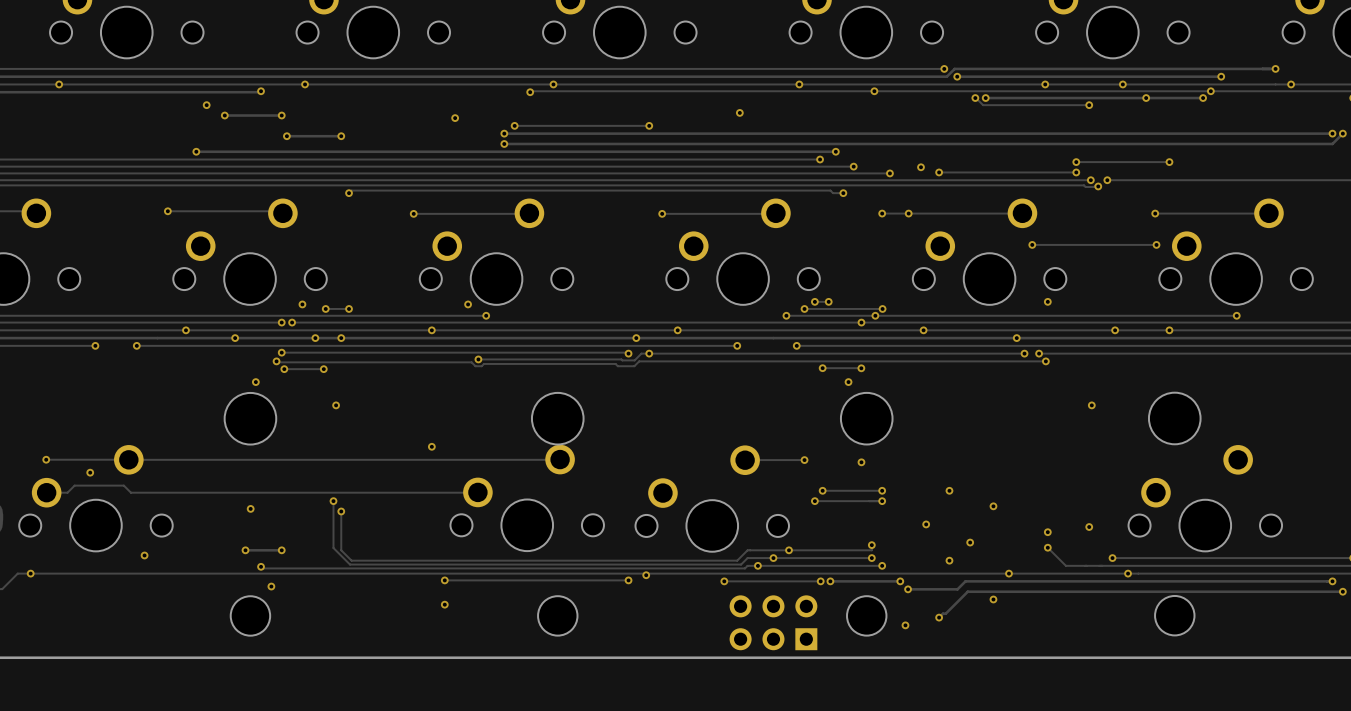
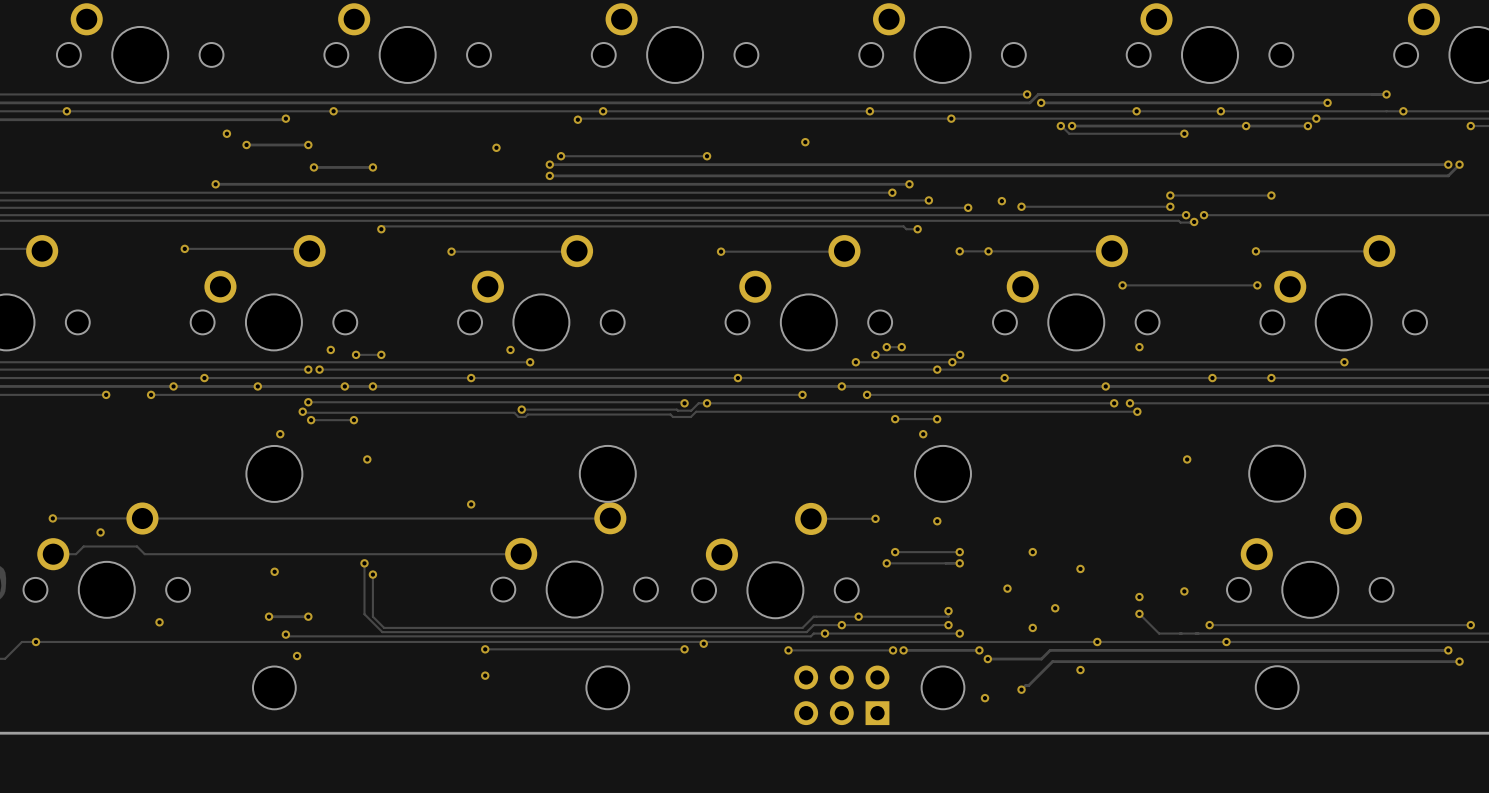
via: none -> (173, 386)
via: (636, 338) -> none
via: none -> (841, 386)

